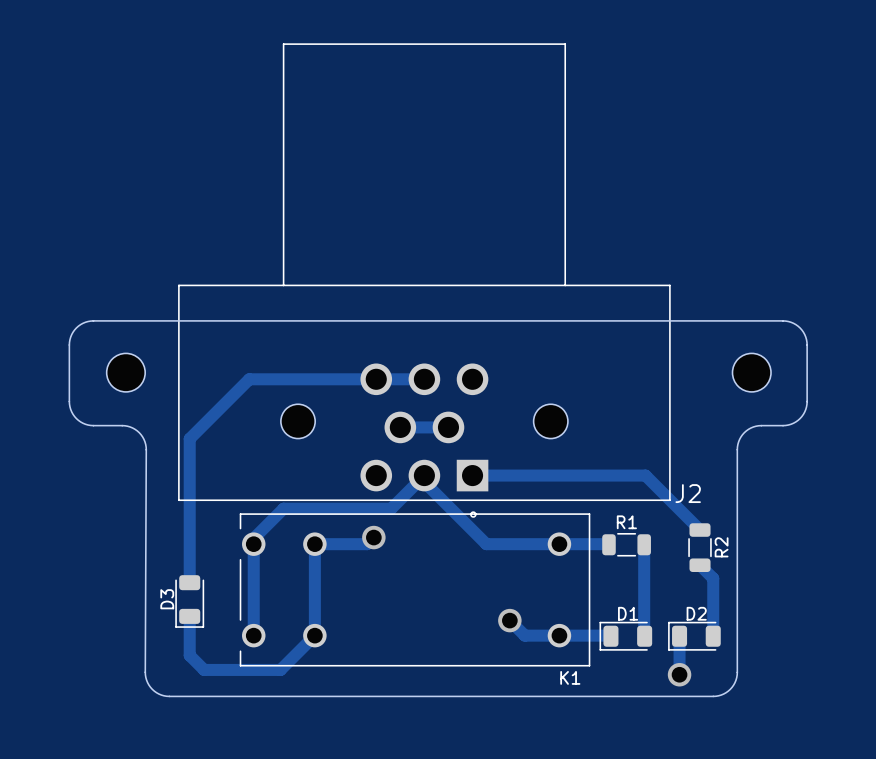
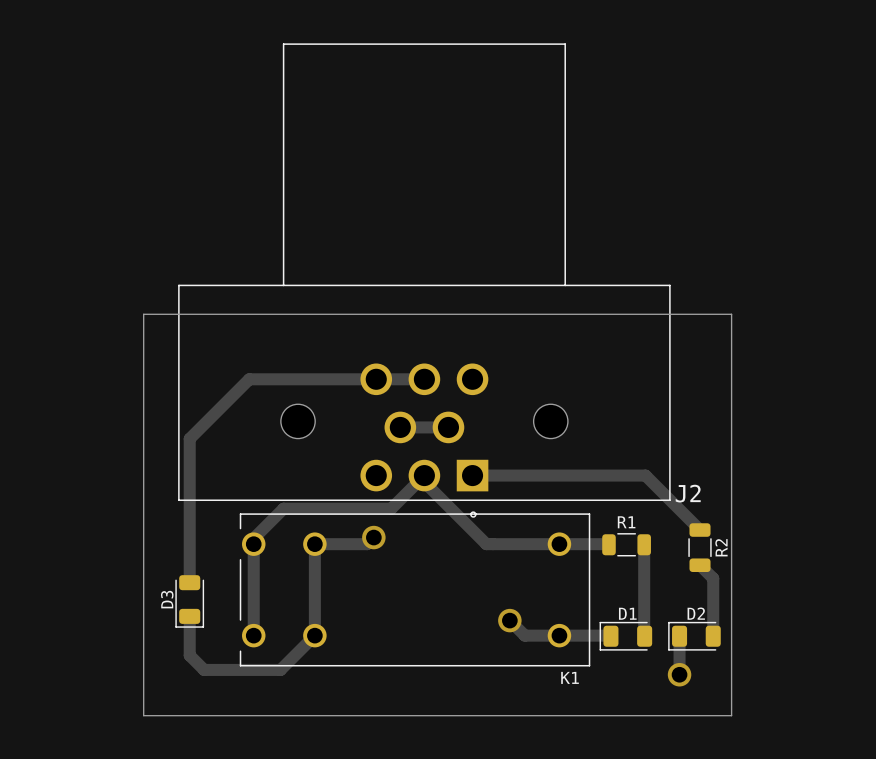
board edge: (93, 320) (783, 320) (795, 324) (803, 332) (806, 342) (807, 401) (804, 412) (800, 418) (791, 424) (758, 425) (750, 428) (742, 434) (737, 444) (737, 672) (733, 685) (726, 692) (713, 696) (169, 696) (156, 692) (148, 685) (145, 672) (144, 441) (139, 432) (130, 426) (90, 425) (82, 423) (73, 414) (69, 404) (69, 339) (78, 326) (93, 320) -> (143, 314) (143, 715) (731, 715) (731, 314) (143, 314)
part: (125, 372) -> none
part: (751, 372) -> none

